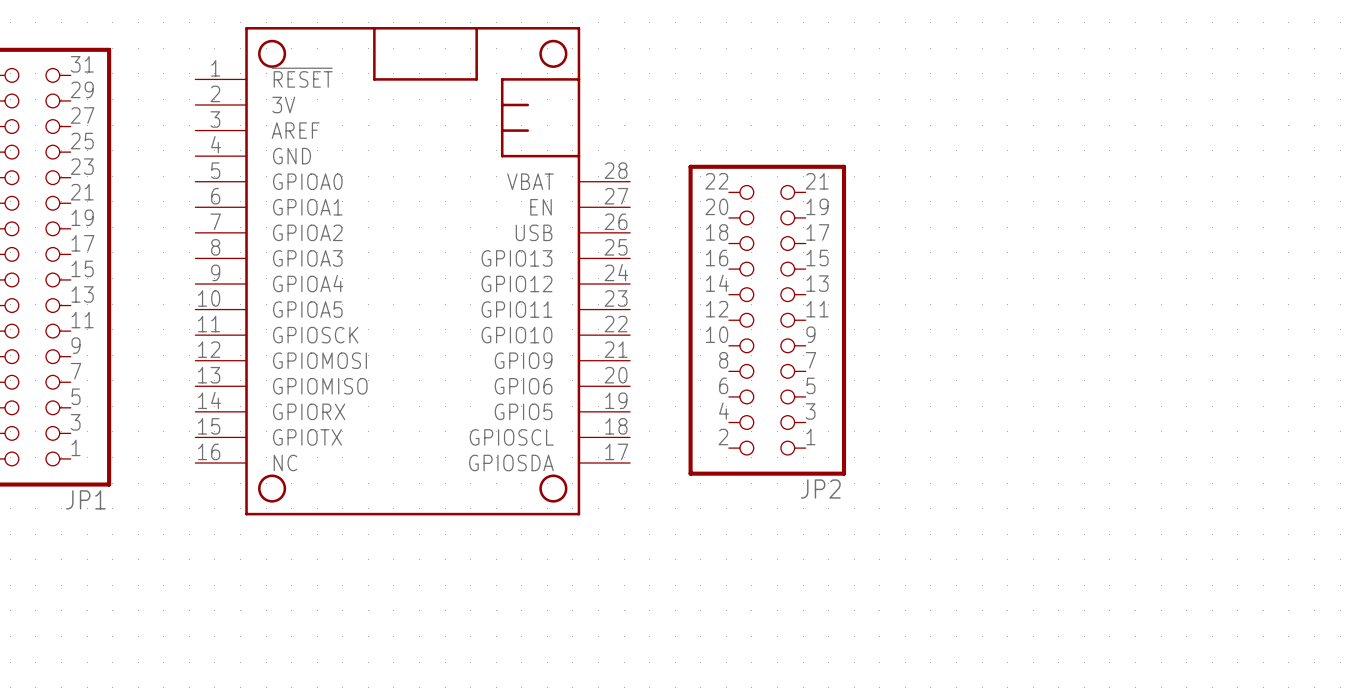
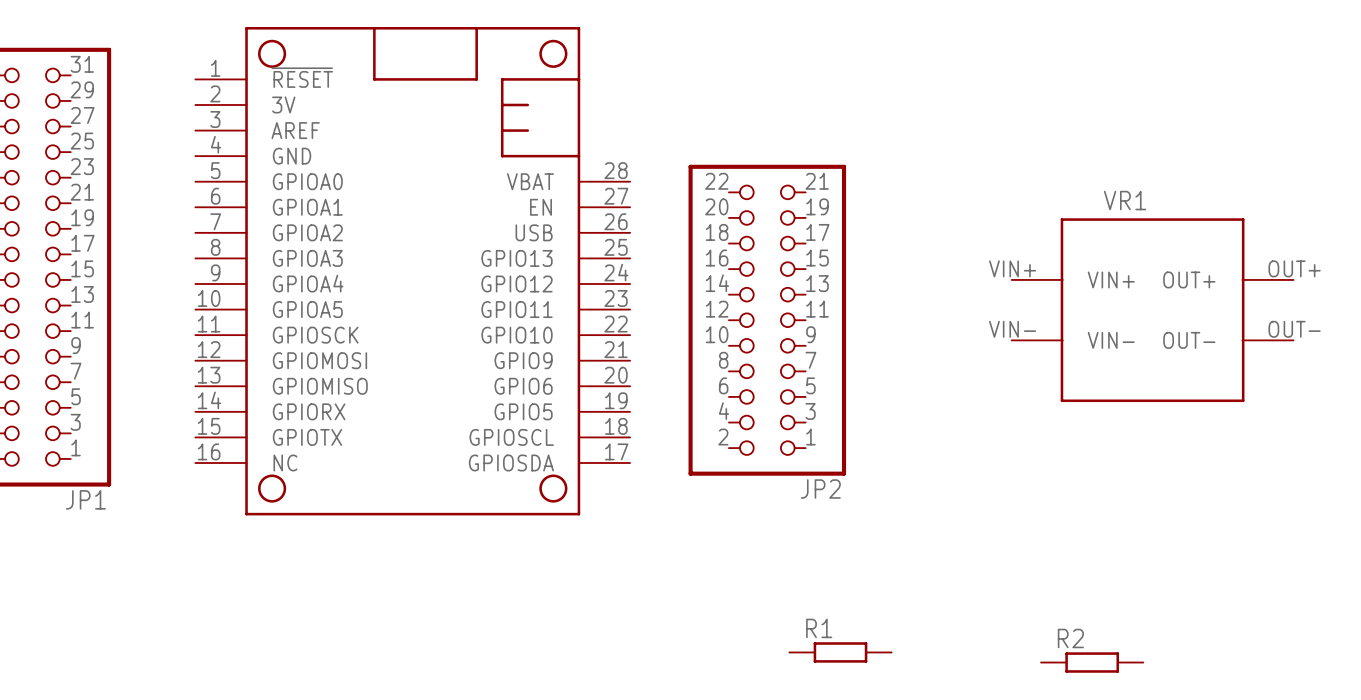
VR1: none -> (1152, 310)
R1: none -> (840, 652)
R2: none -> (1092, 662)

